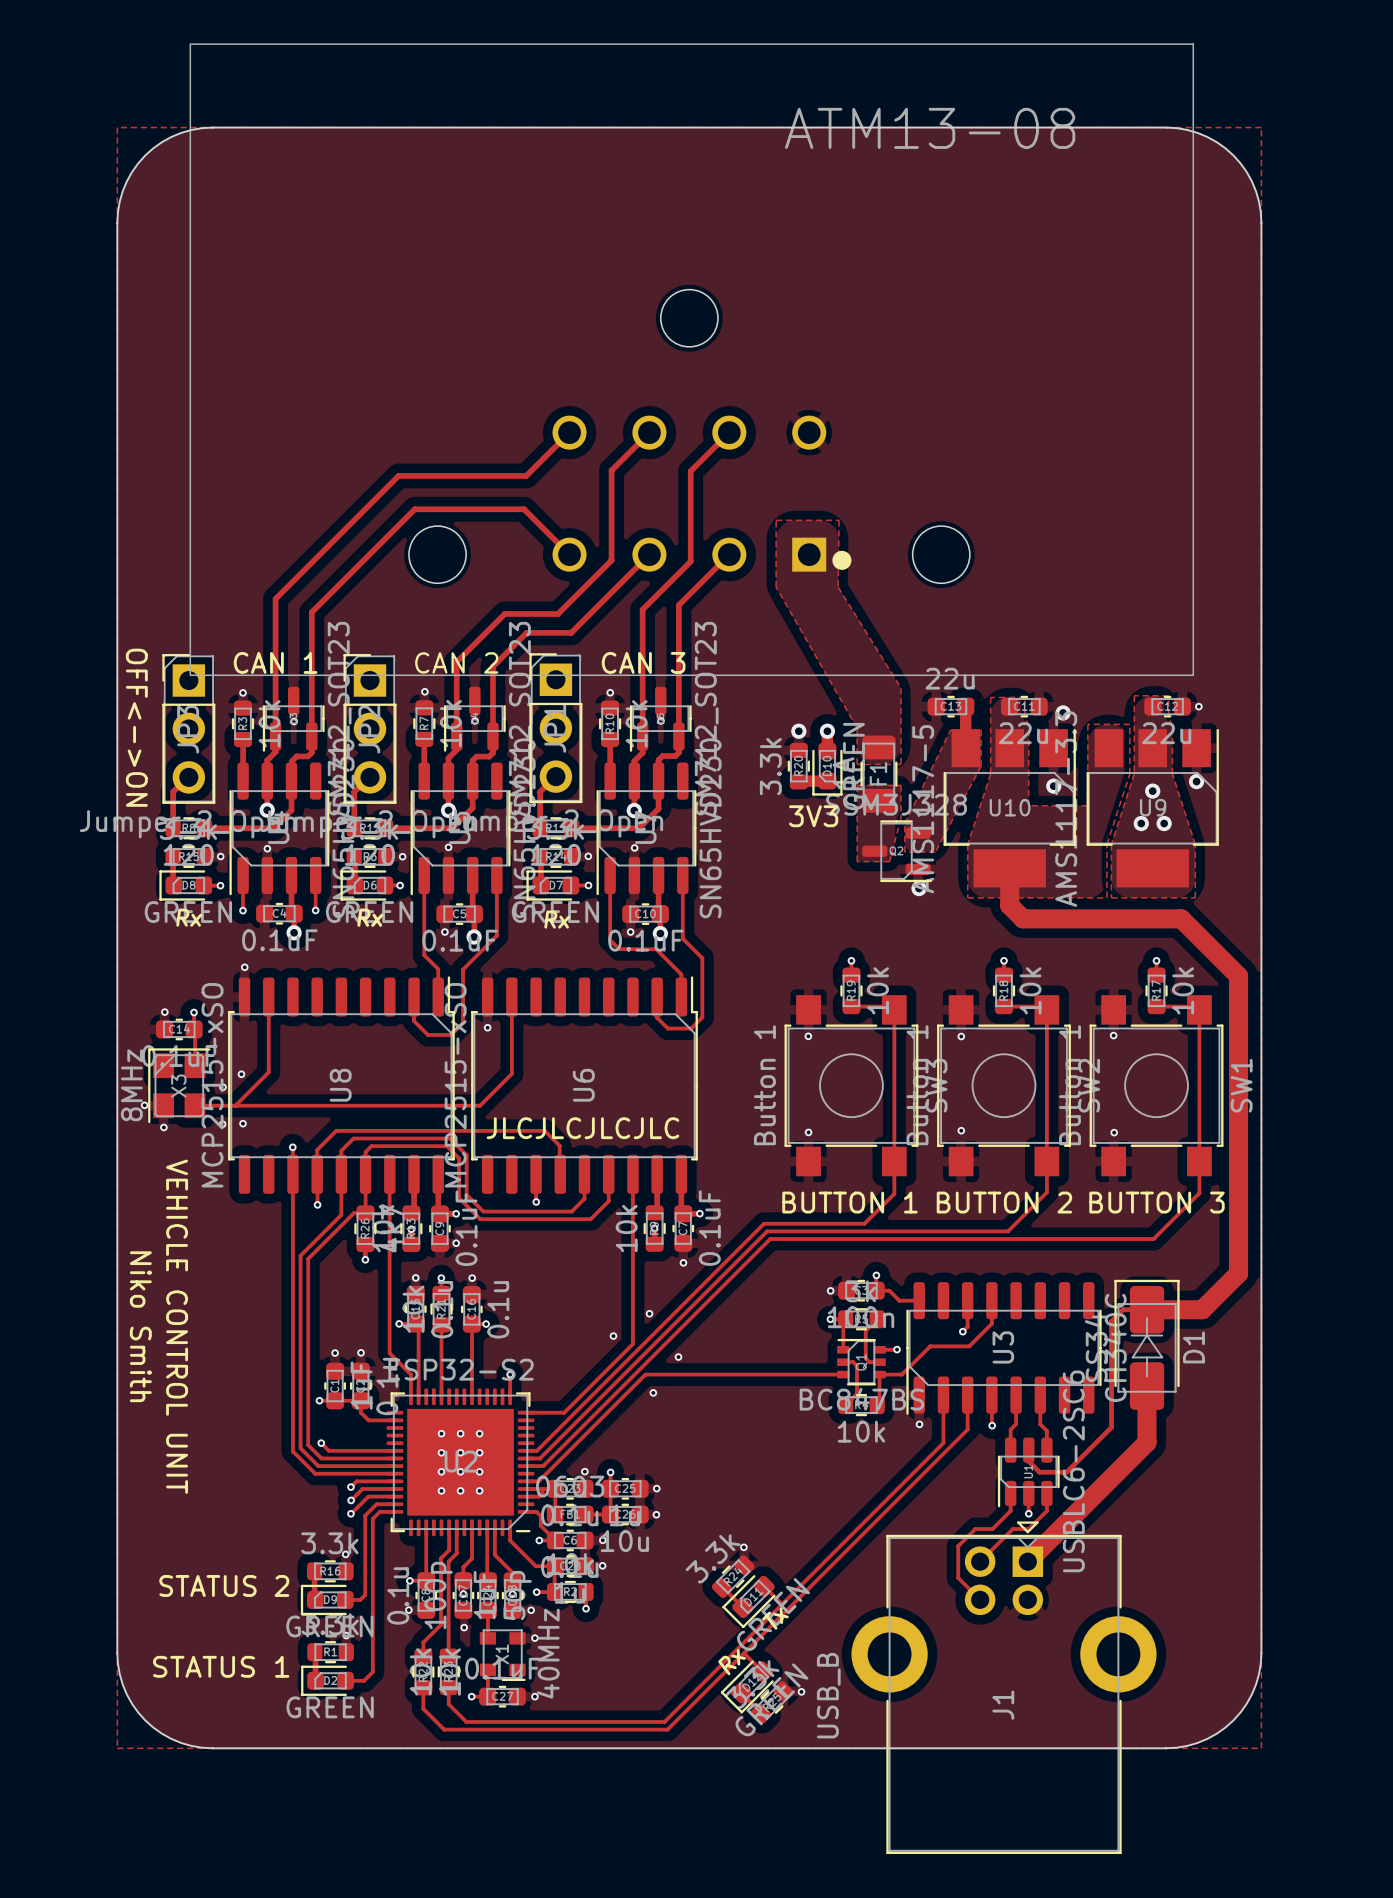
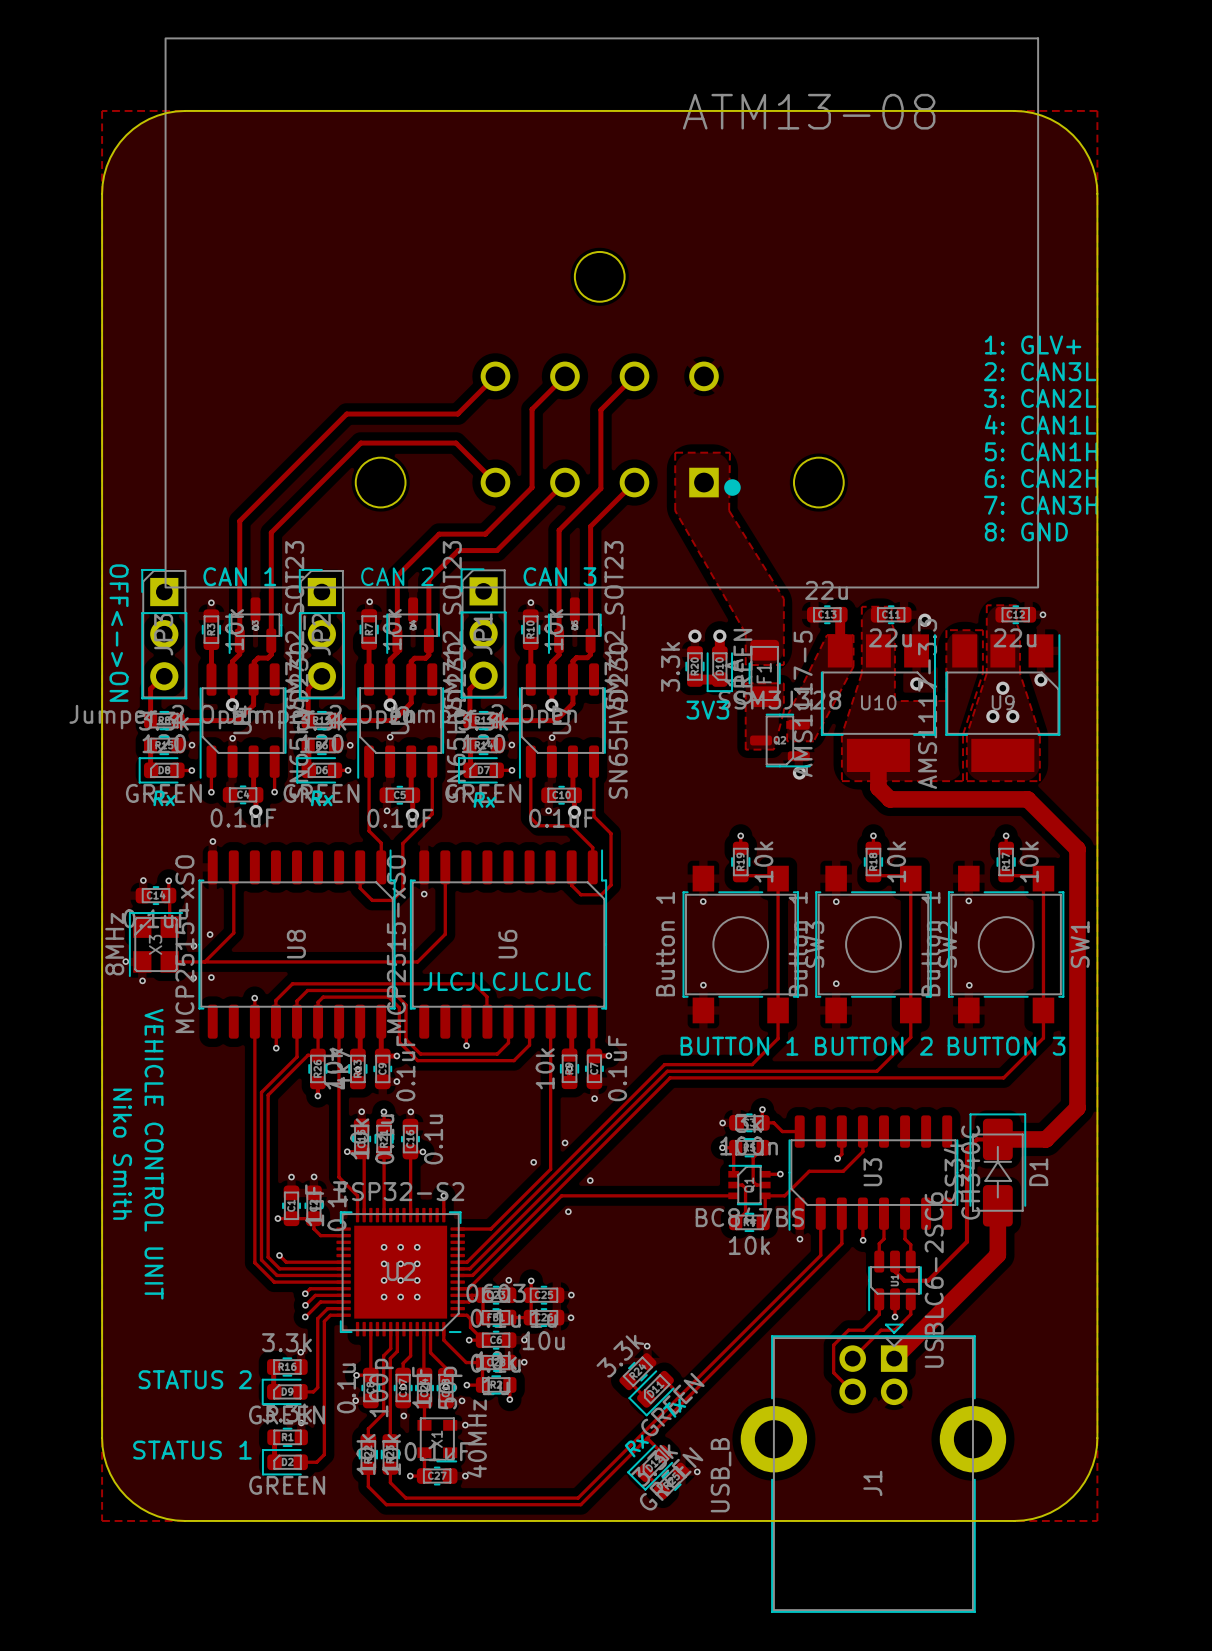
text: none -> 1: GLV+ (1033, 344)
text: none -> 2: CAN3L (1040, 371)
text: none -> 3: CAN2L (1040, 398)
text: none -> 4: CAN1L (1040, 424)
text: none -> 5: CAN1H (1041, 451)
text: none -> 6: CAN2H (1041, 478)
text: none -> 7: CAN3H (1040, 505)
text: none -> 8: GND (1026, 531)

